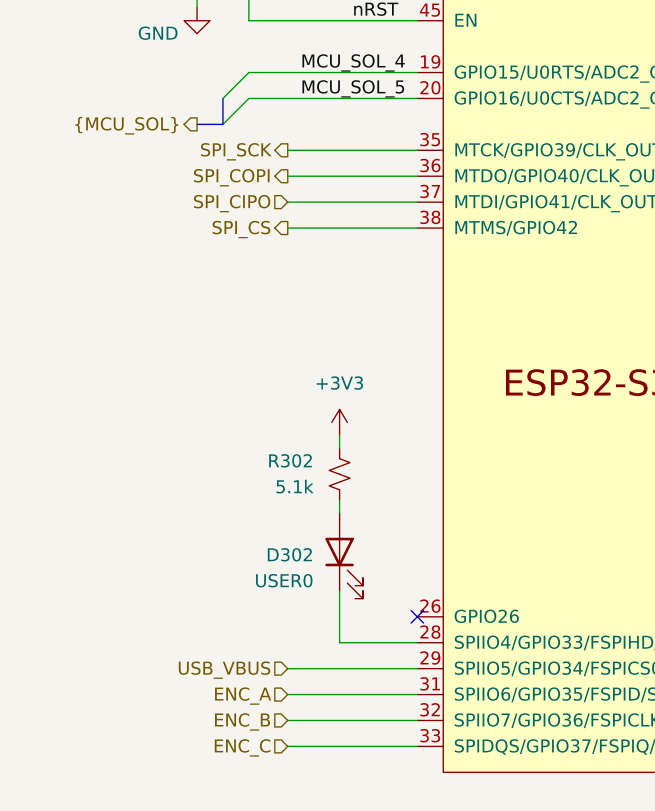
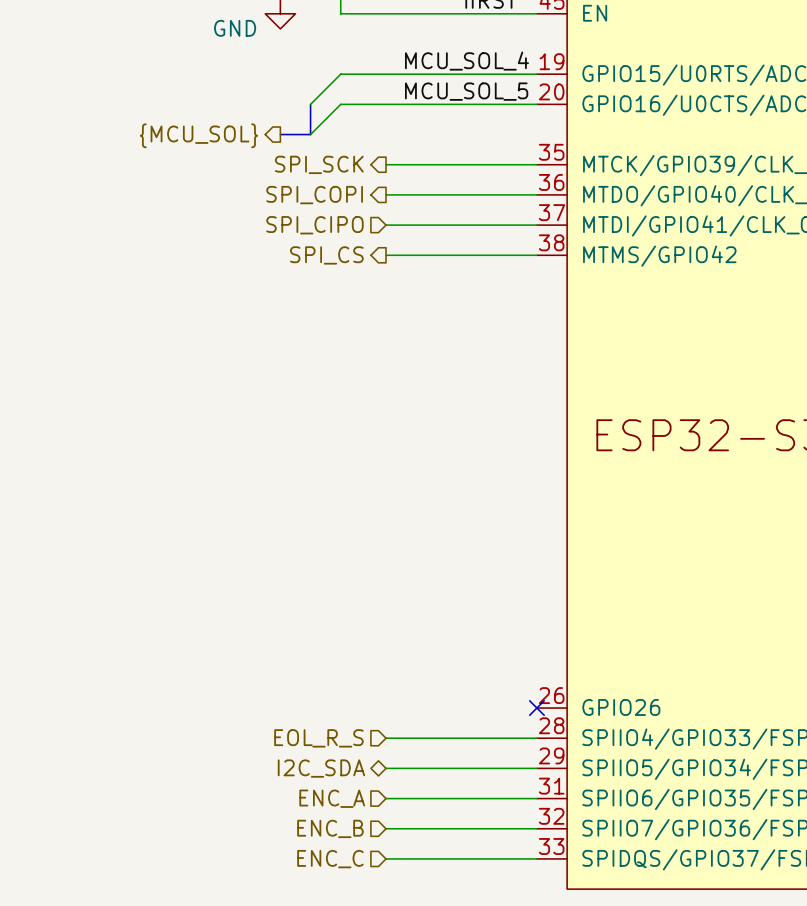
power symbol: +3V3 (339, 422) -> none
wire: (339, 435) (339, 448) -> none
R302: 5.1k (339, 474) -> none
wire: (339, 500) (339, 513) -> none
D302: USER0 (344, 555) -> none
wire: (339, 590) (339, 642) -> (386, 738) (446, 738)
hierarchical label: none -> EOL_R_S (318, 738)
hierarchical label shape: input (224, 670) -> bidirectional (321, 768)
hierarchical label: USB_VBUS (224, 670) -> I2C_SDA (321, 768)

